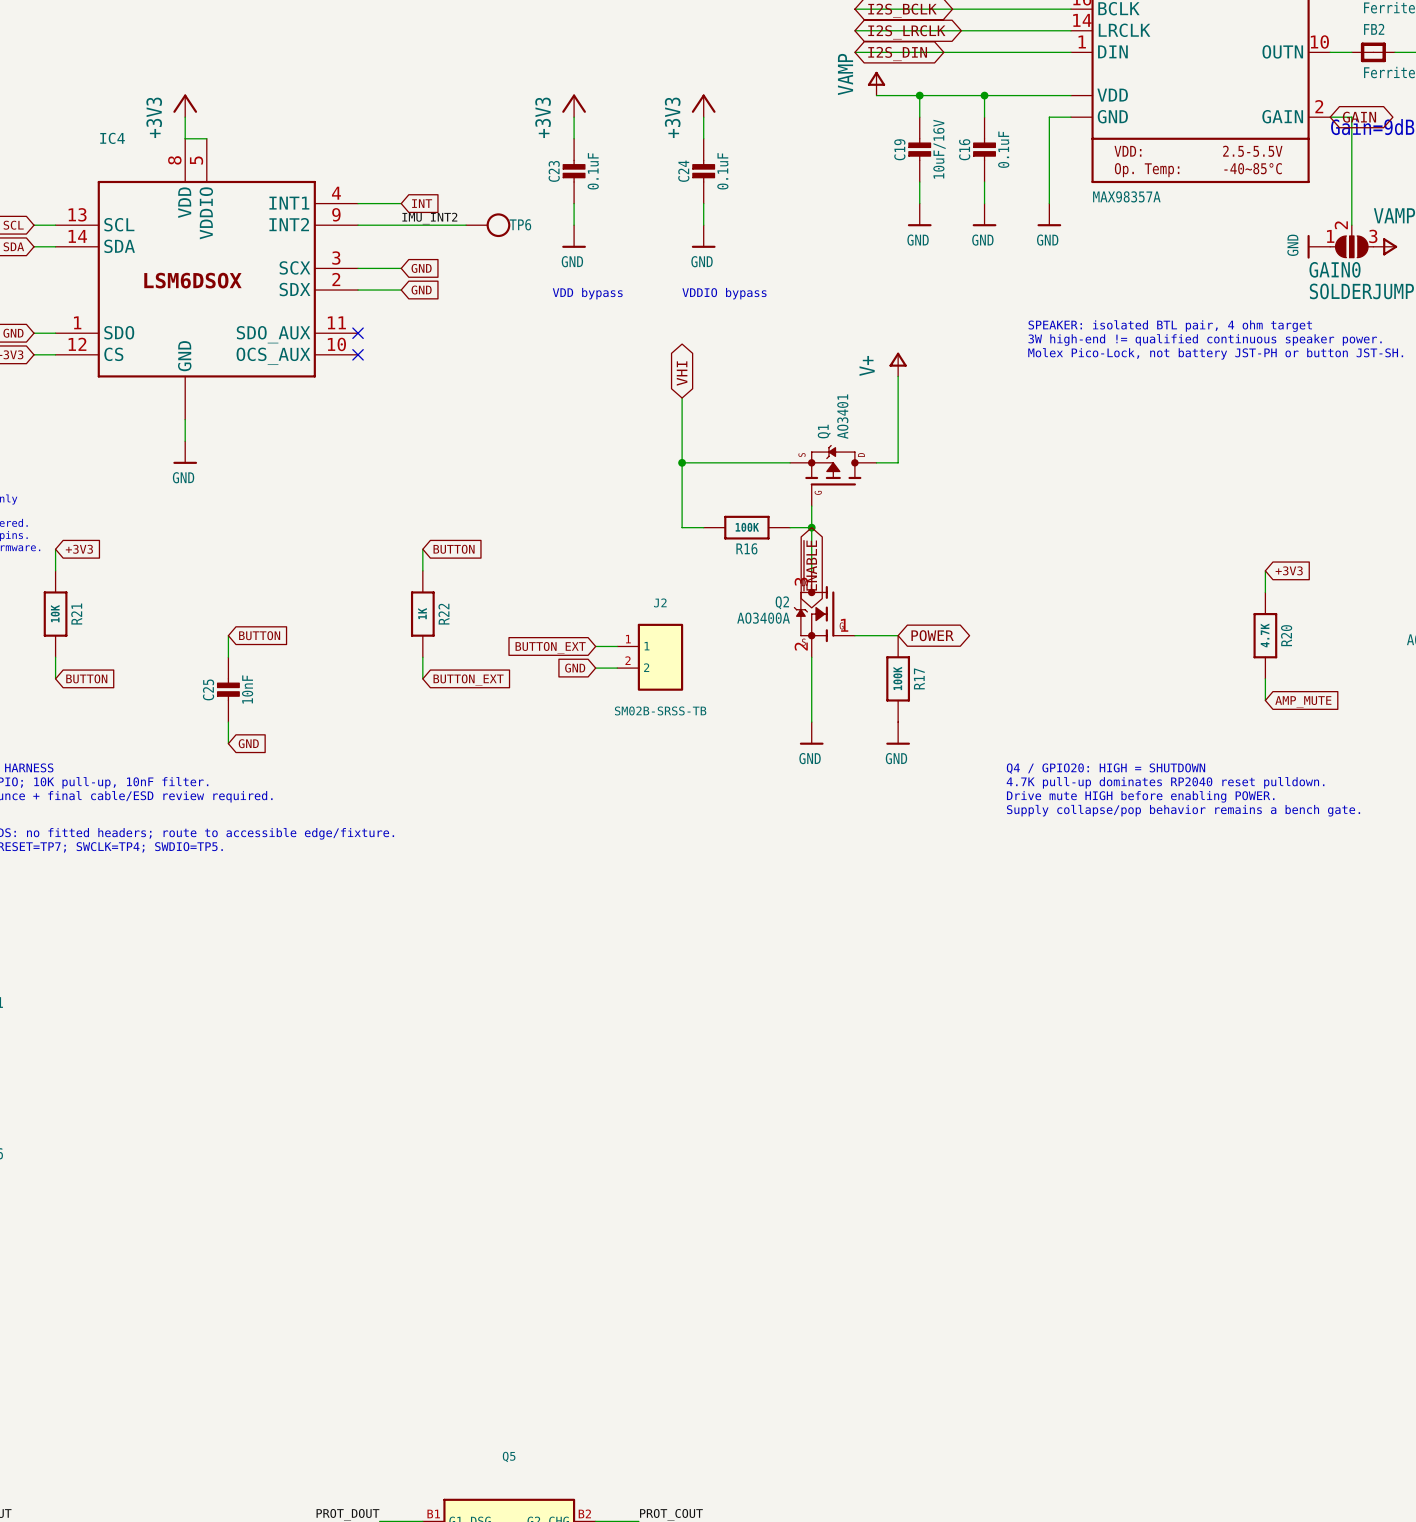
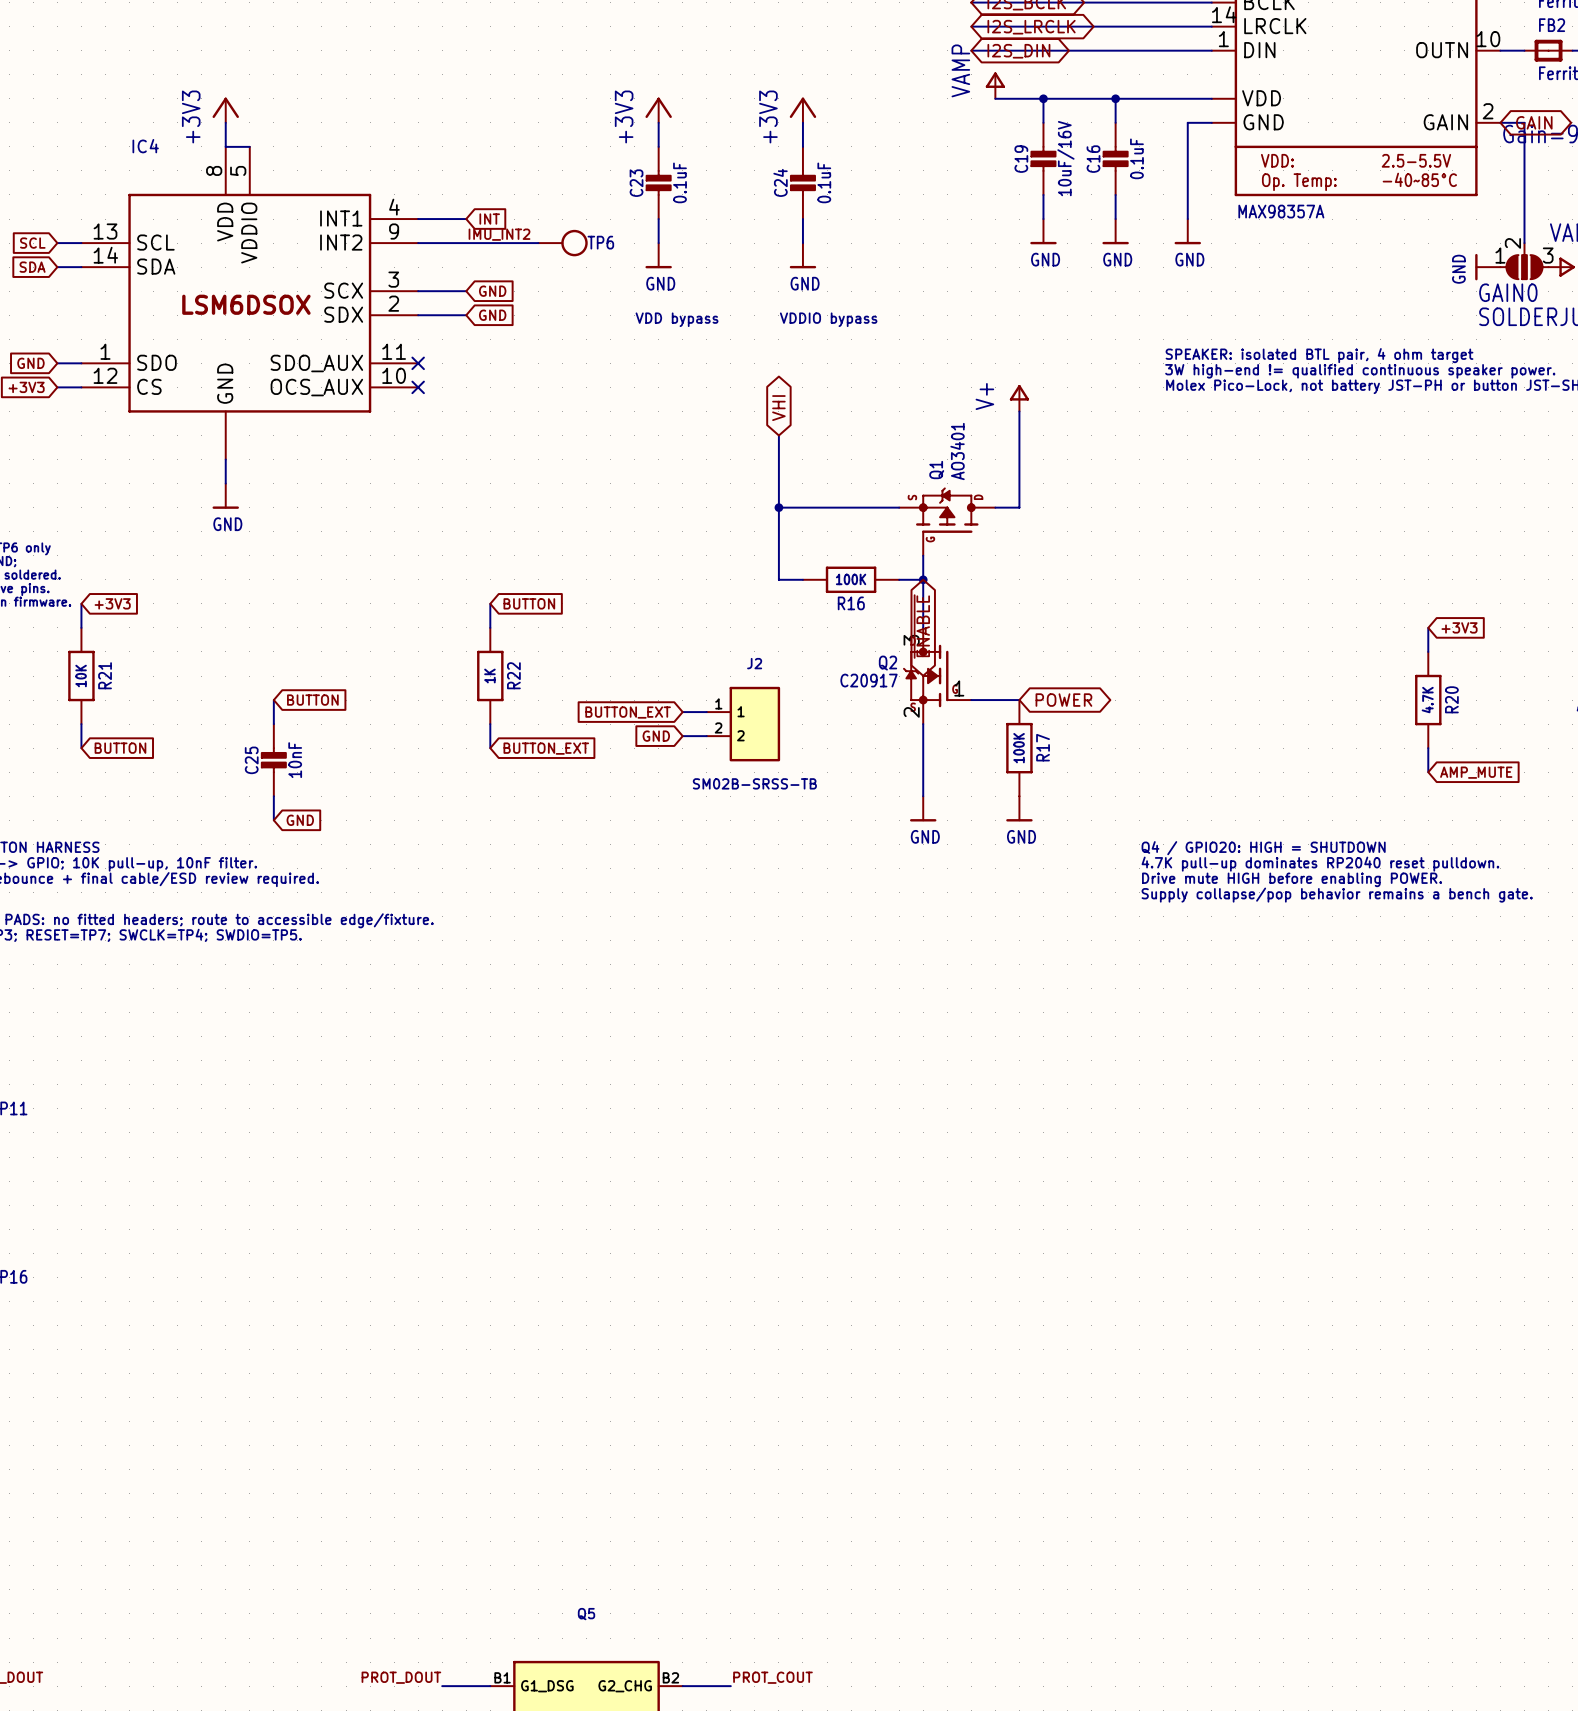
Q2 value: AO3400A (763, 618) -> C20917 (869, 680)

